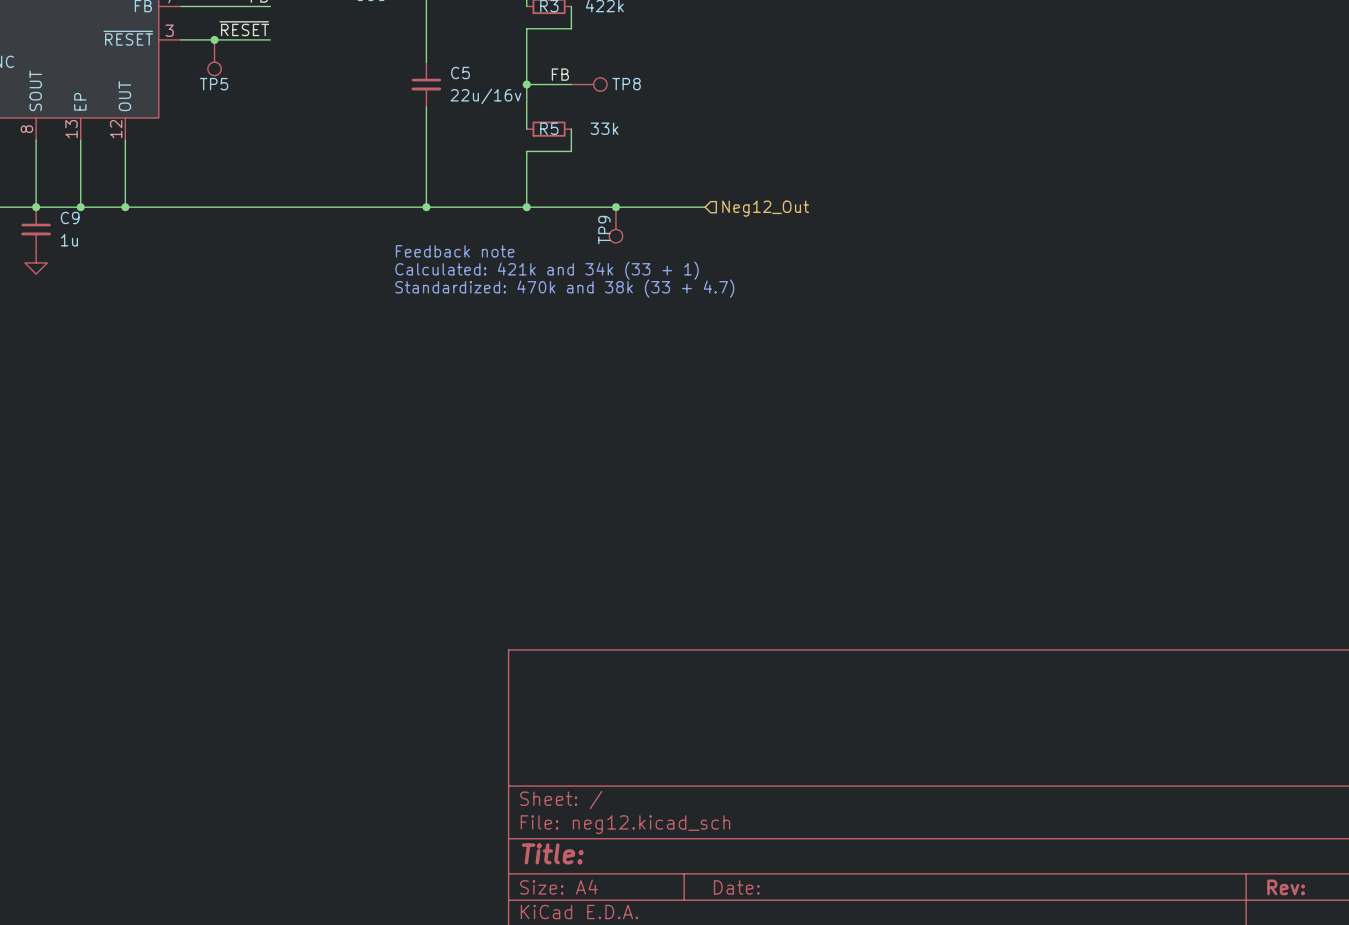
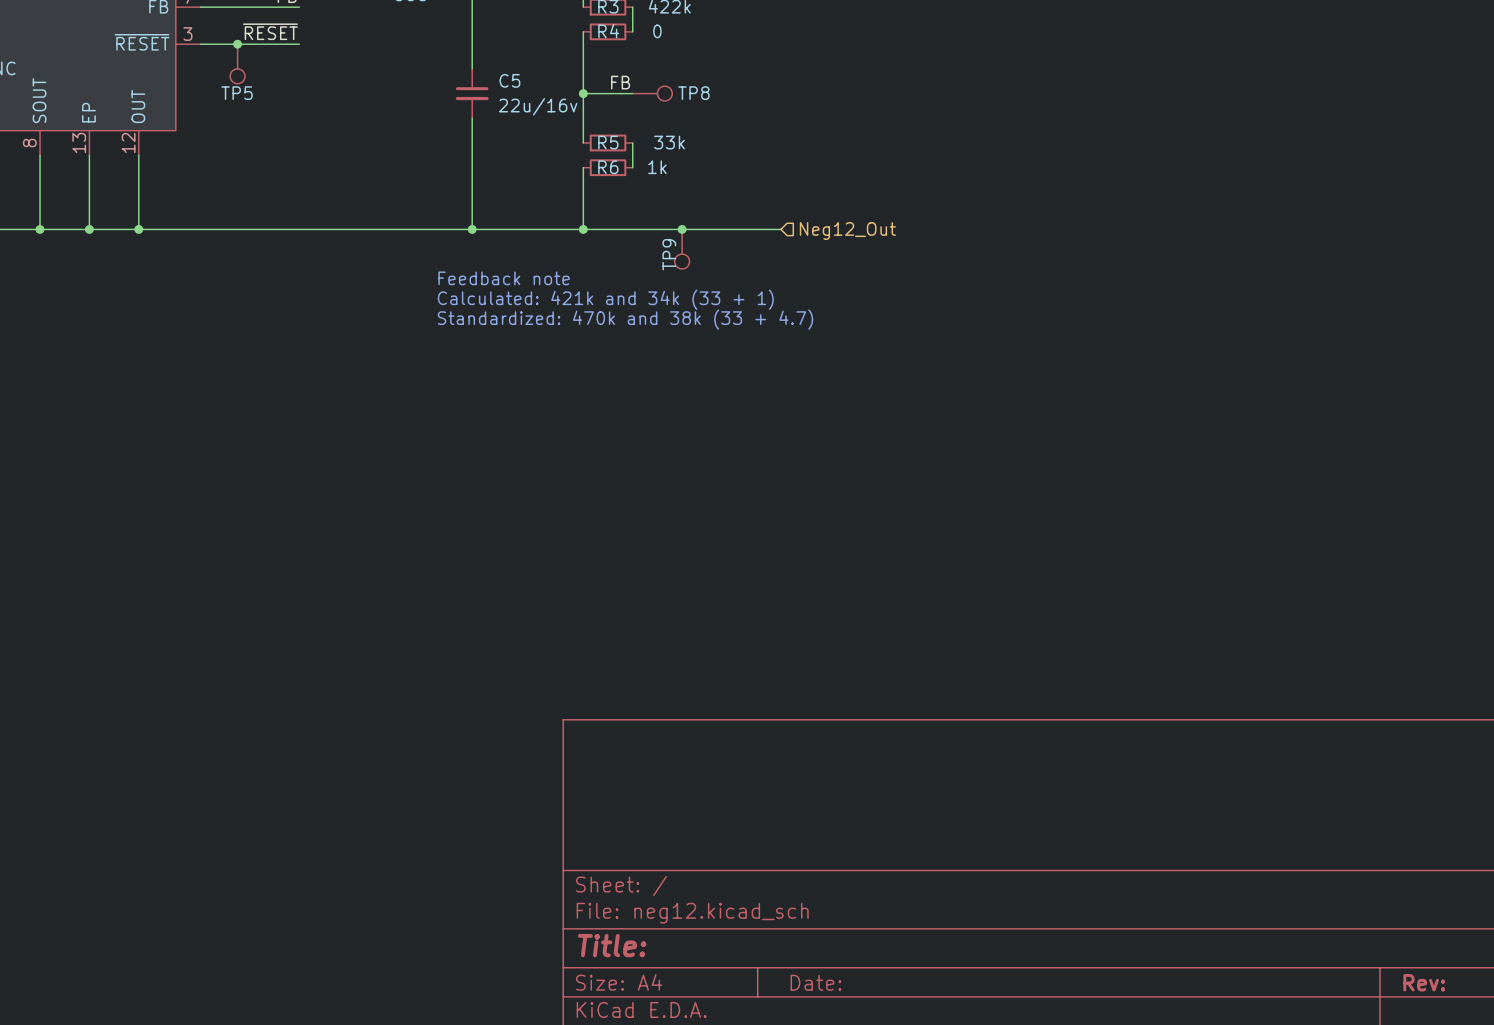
R4: none -> 0 (608, 31)
R6: none -> 1k (608, 167)
C9: 1u (36, 229) -> none
power symbol: (36, 262) -> none

